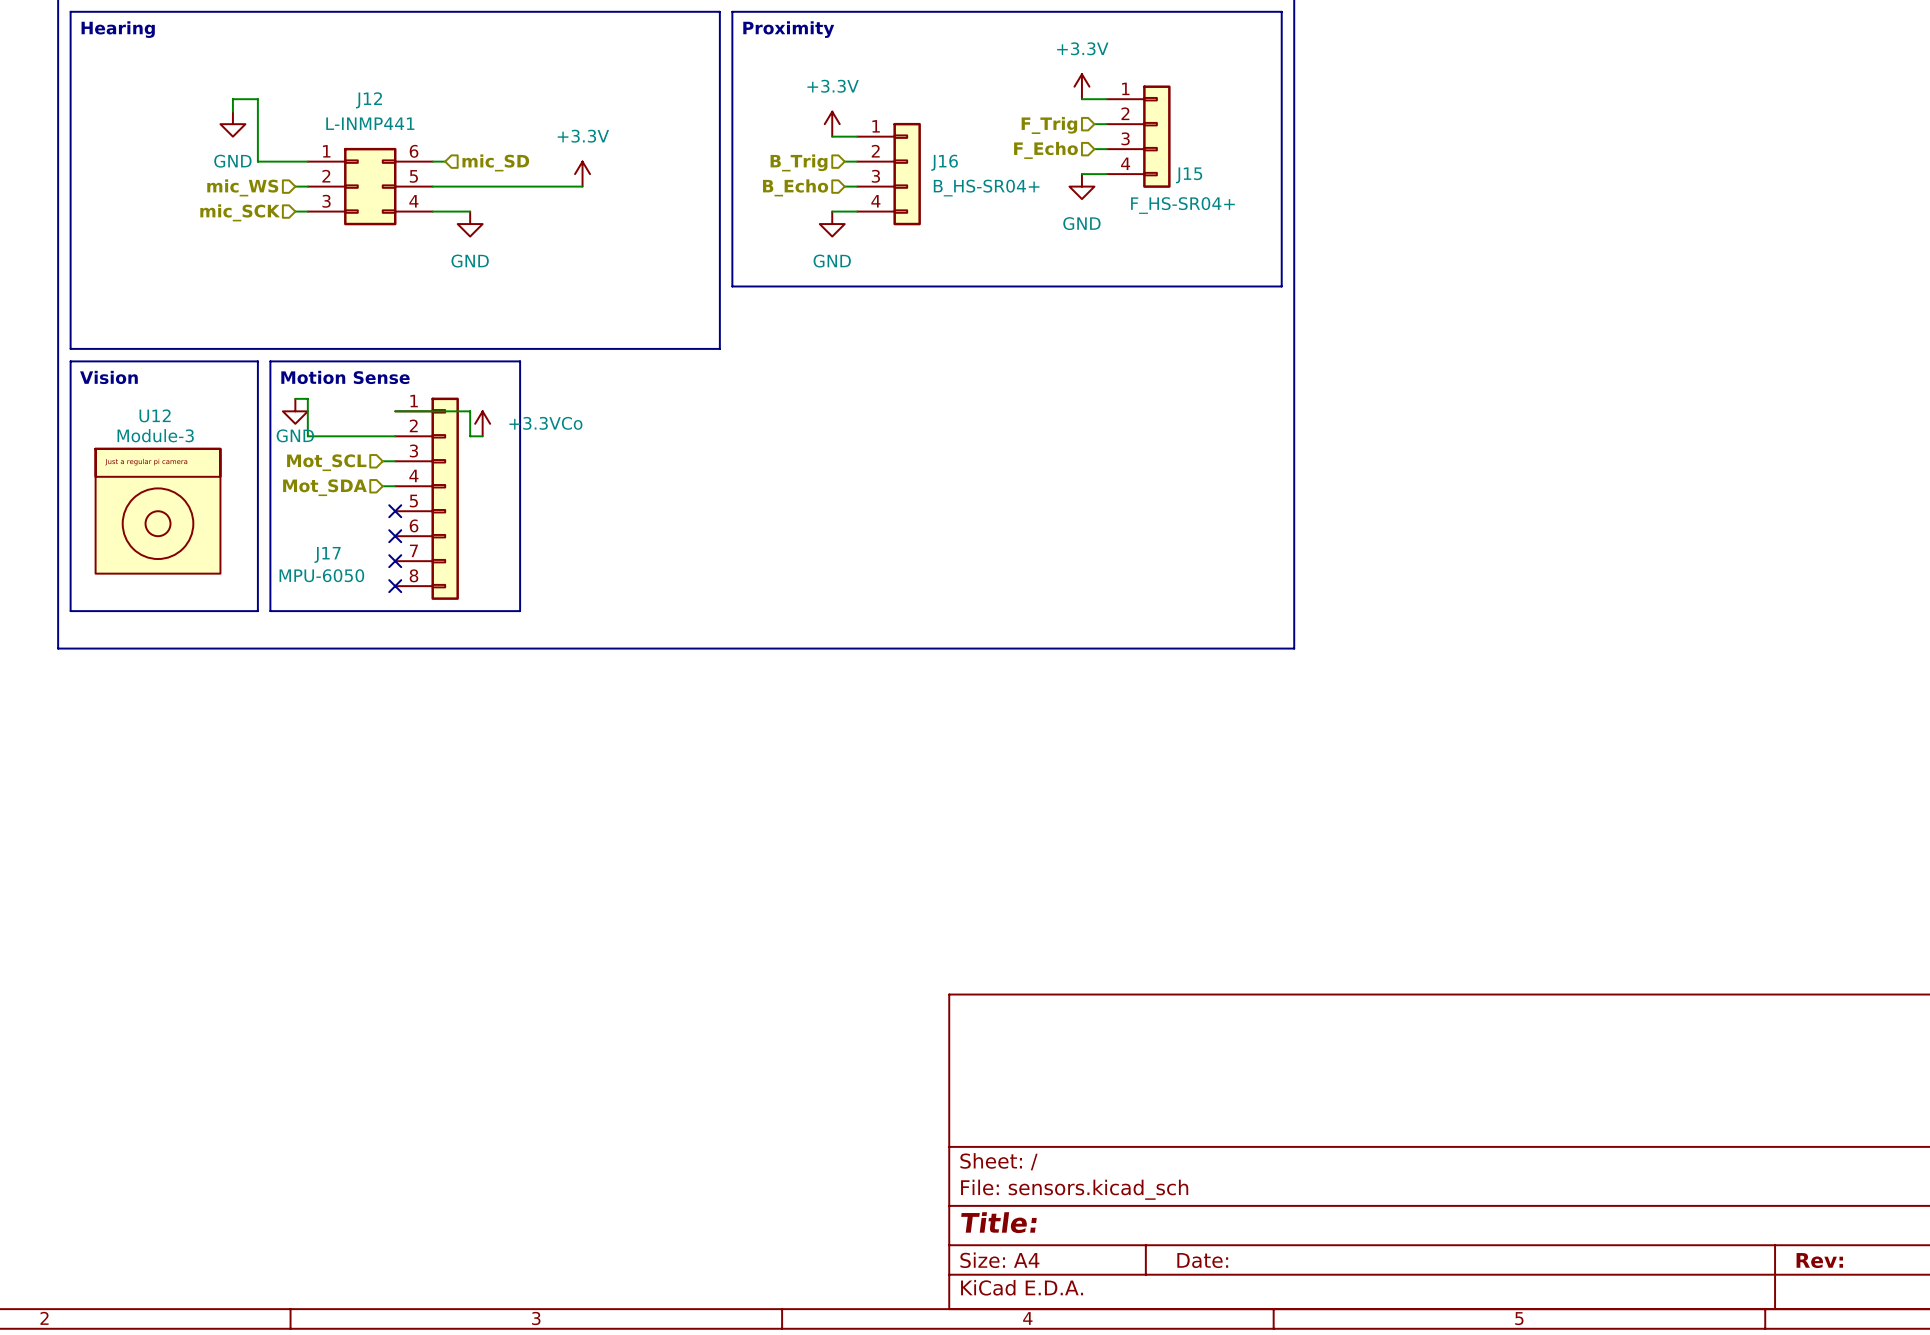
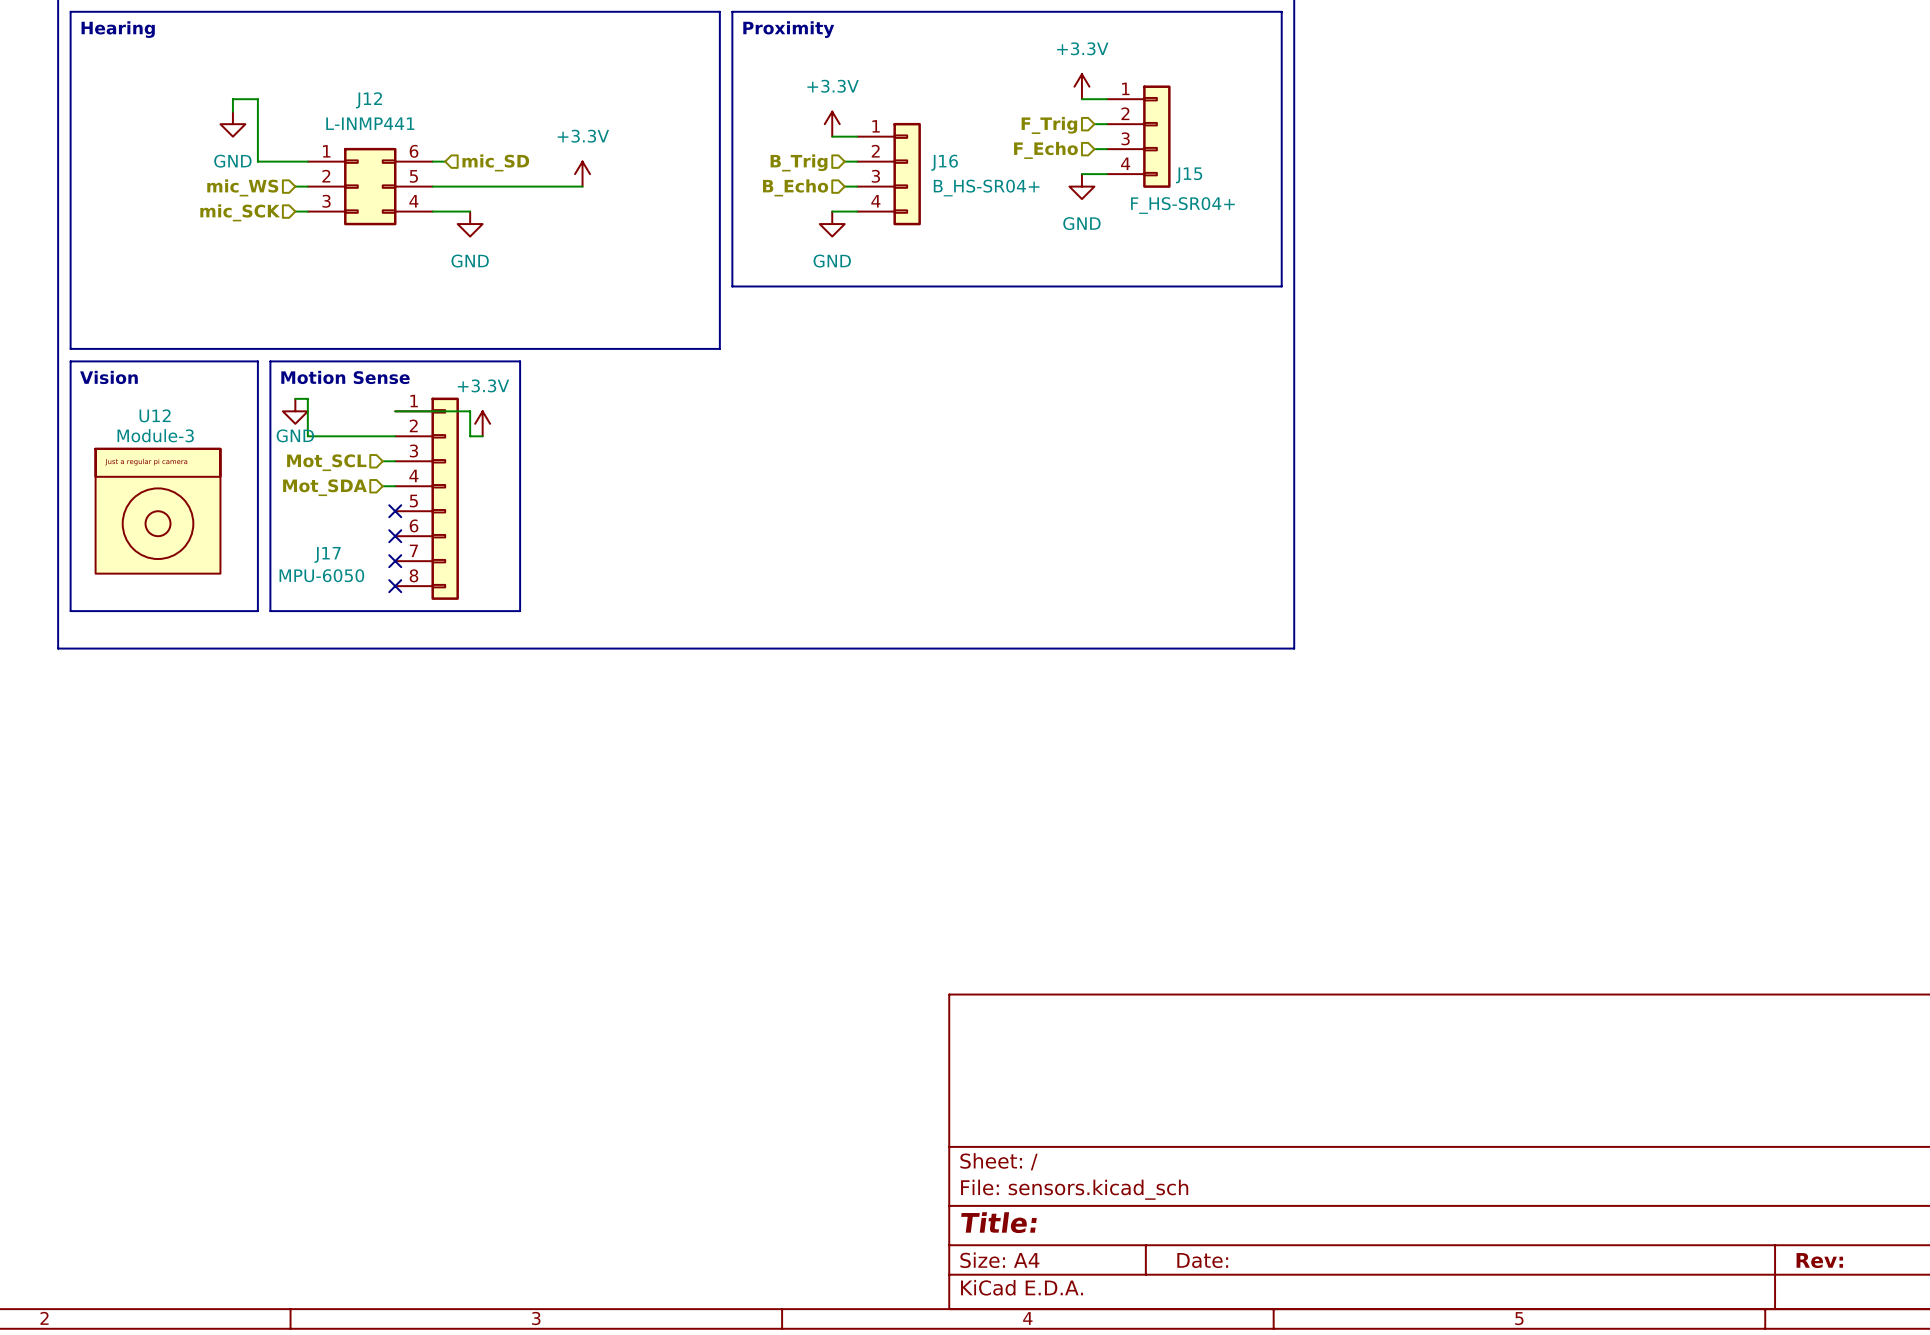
power symbol: +3.3VCo (482, 423) -> +3.3V (482, 423)

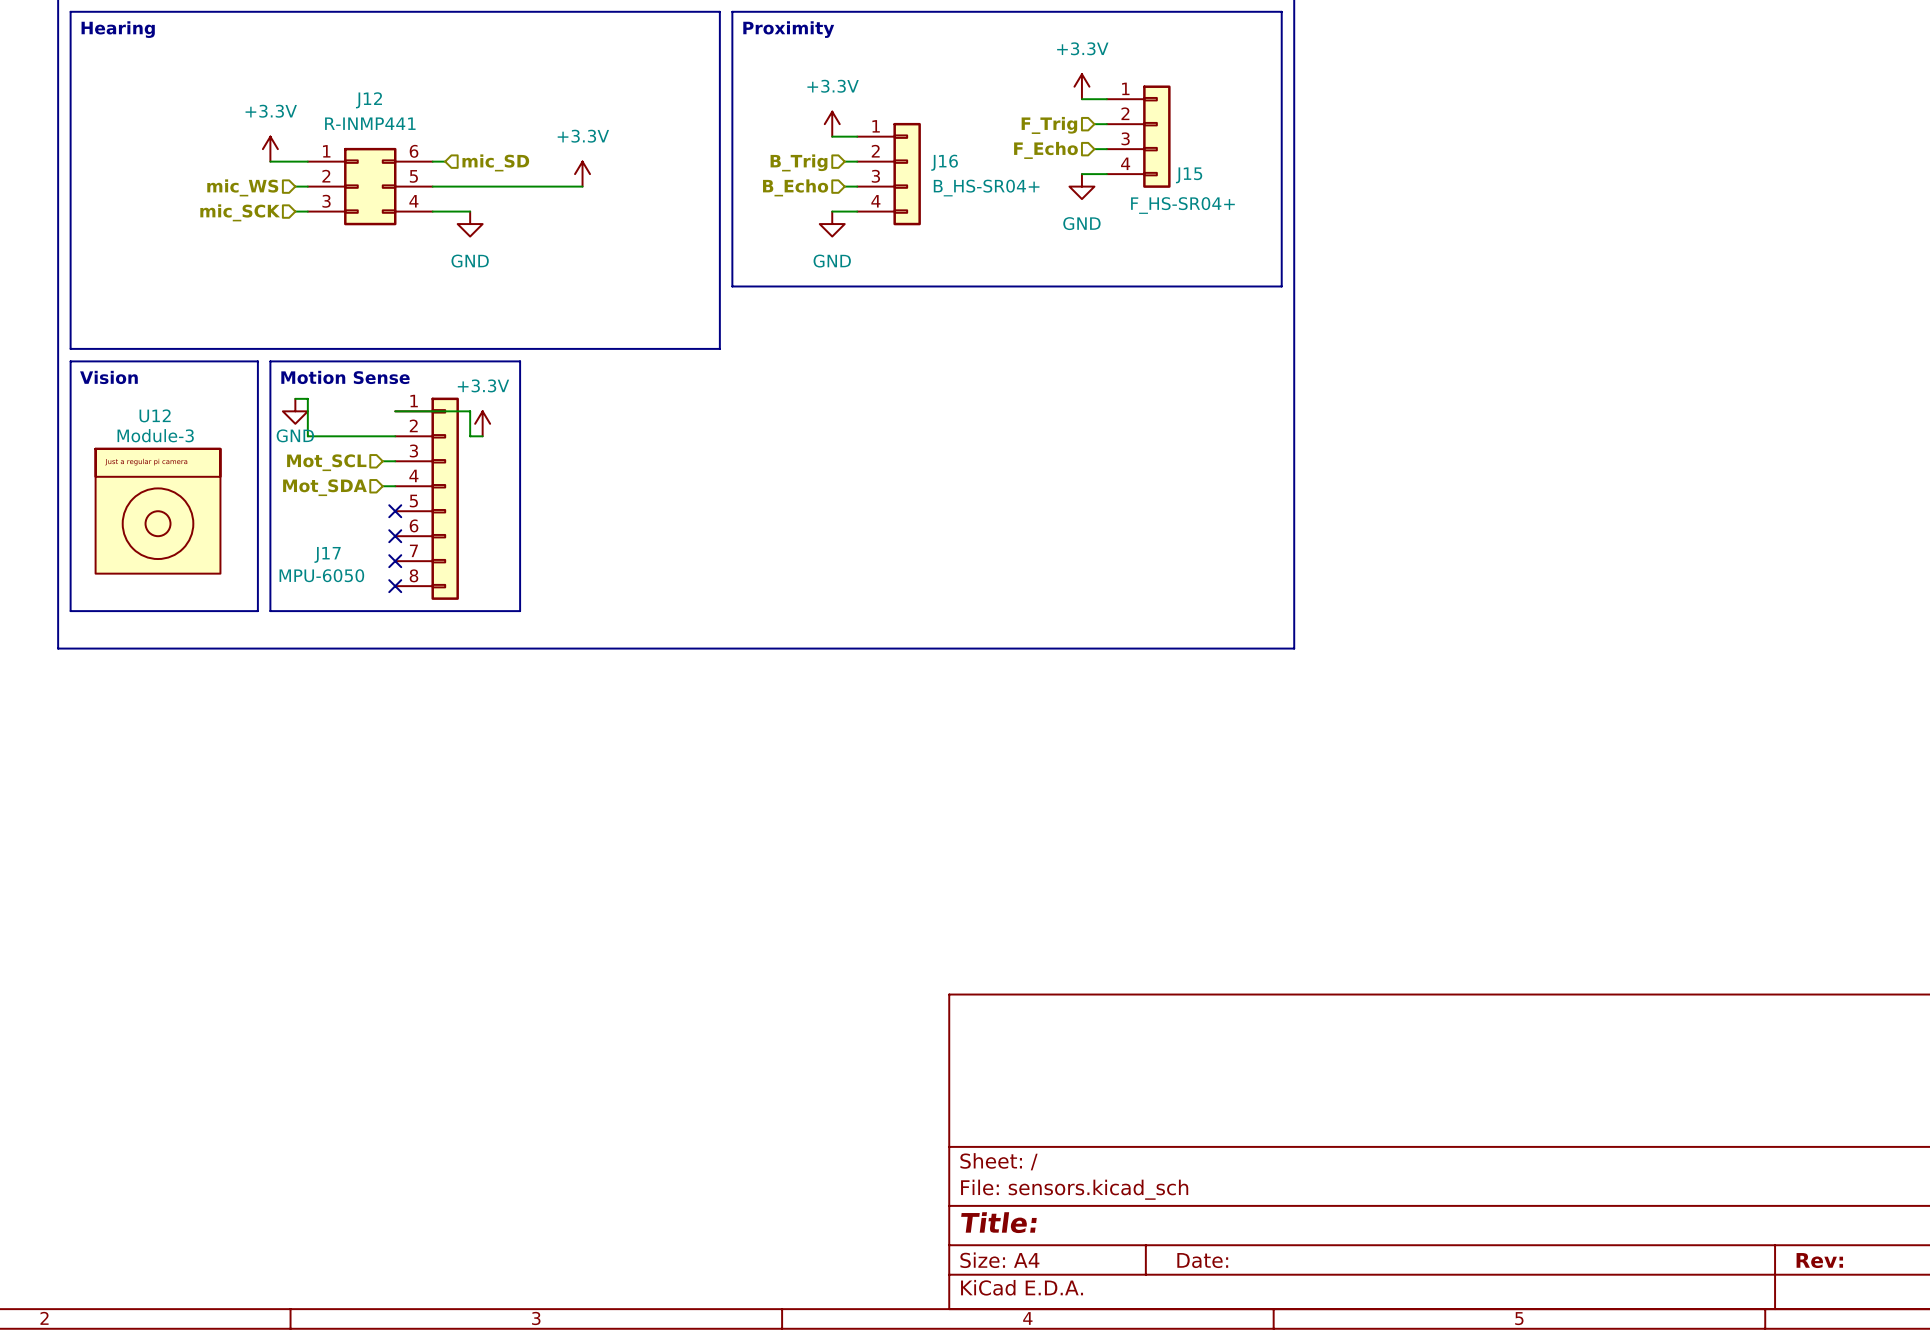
wire: (232, 111) (232, 99) (257, 99) (257, 161) (270, 161) -> none
J12 value: L-INMP441 (370, 123) -> R-INMP441 (370, 123)
power symbol: GND (232, 124) -> none
power symbol: none -> +3.3V (270, 149)

